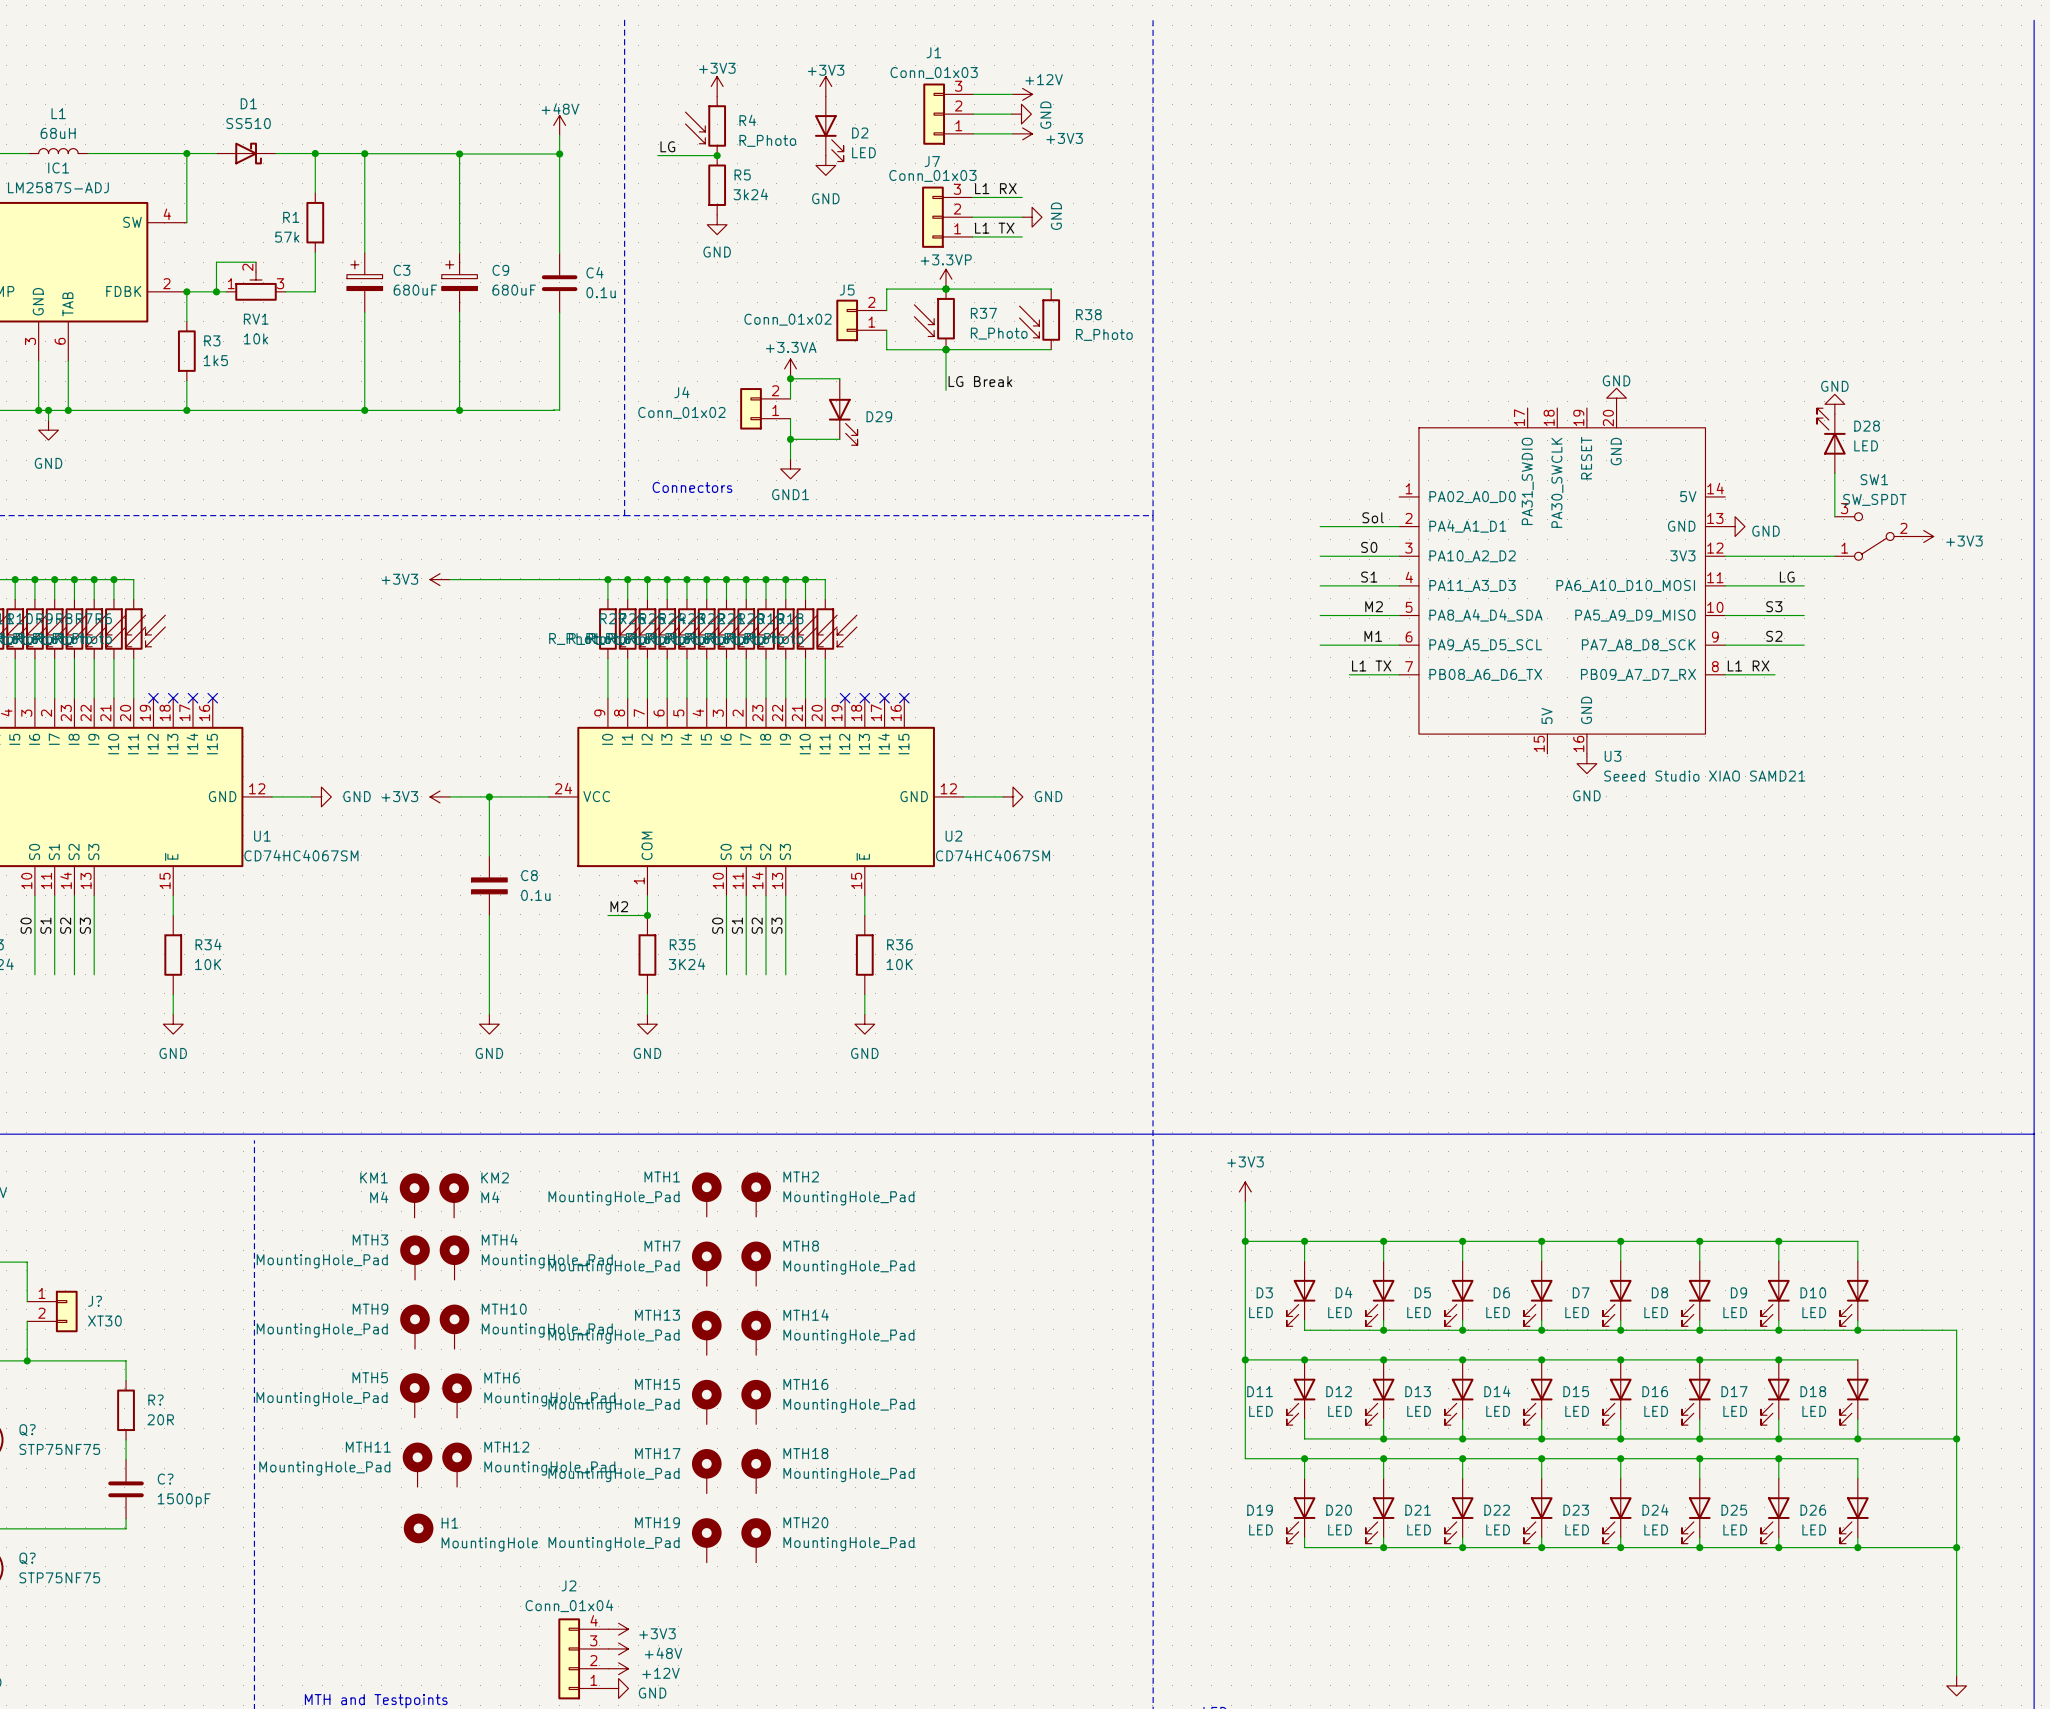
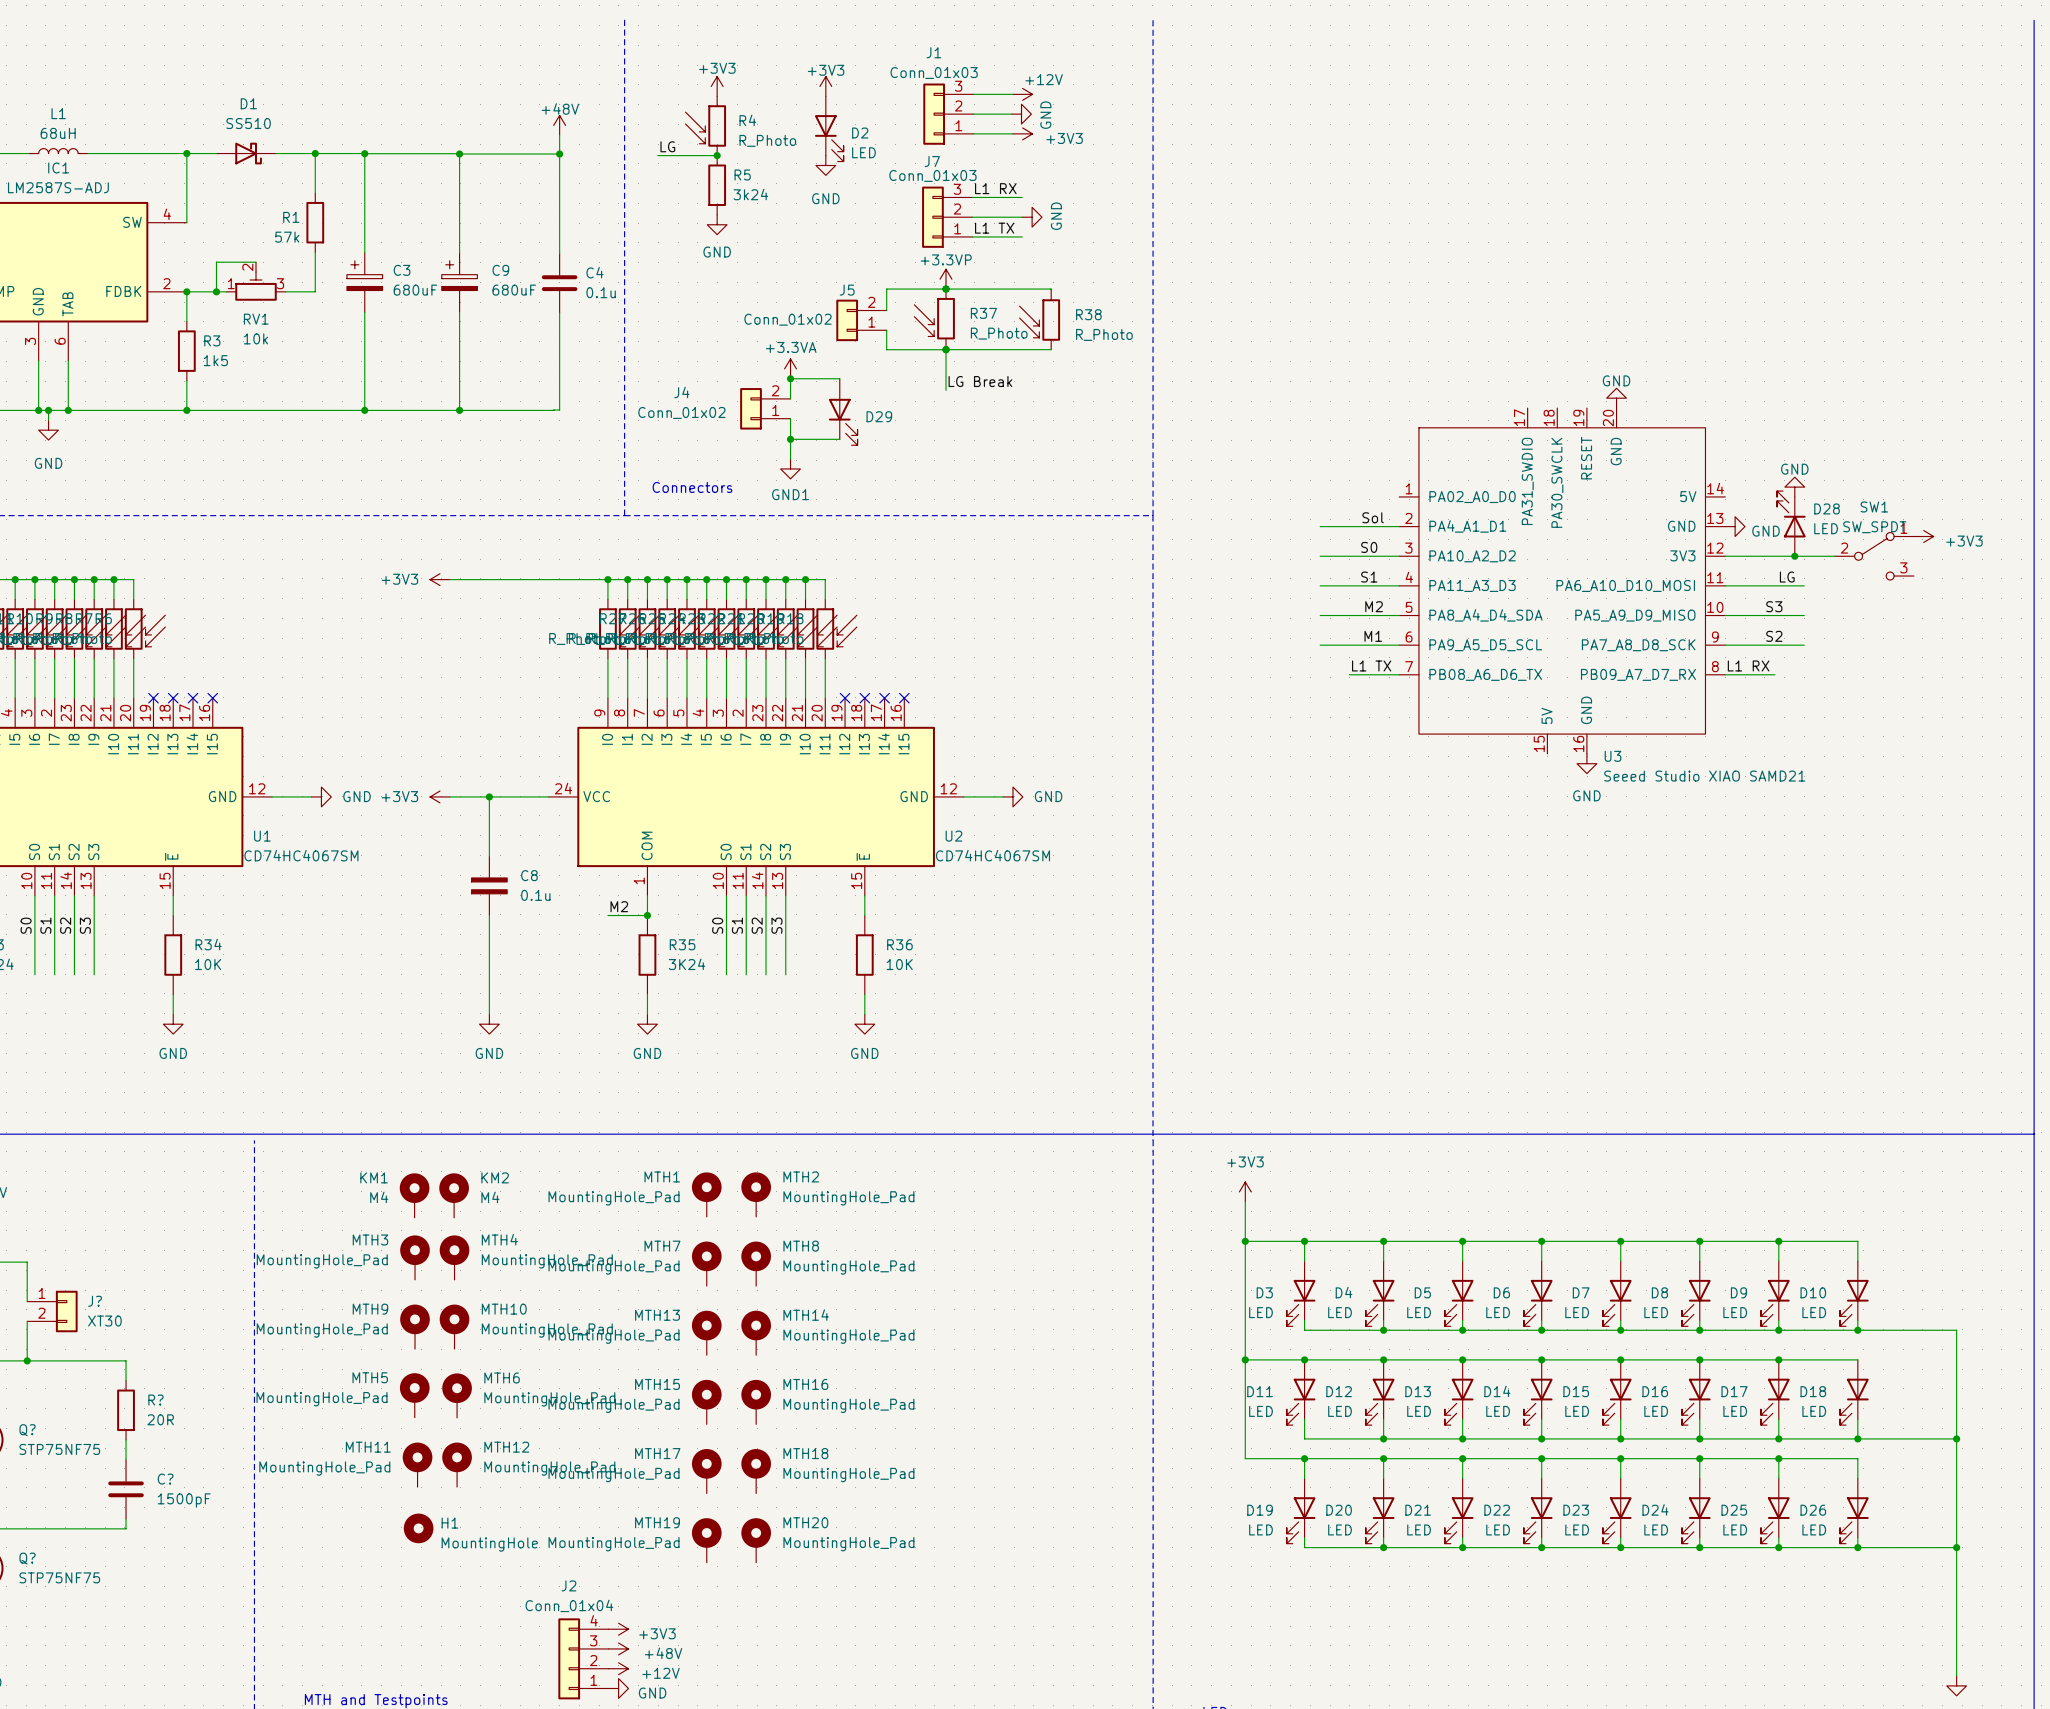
power symbol position: GND (1834, 404) -> GND (1794, 487)
D28 position: (1831, 440) -> (1791, 523)
wire: (1834, 473) (1834, 516) -> none
SW1 rotation: 0° (1874, 536) -> 180° (1874, 556)
junction: none -> (1794, 556)

